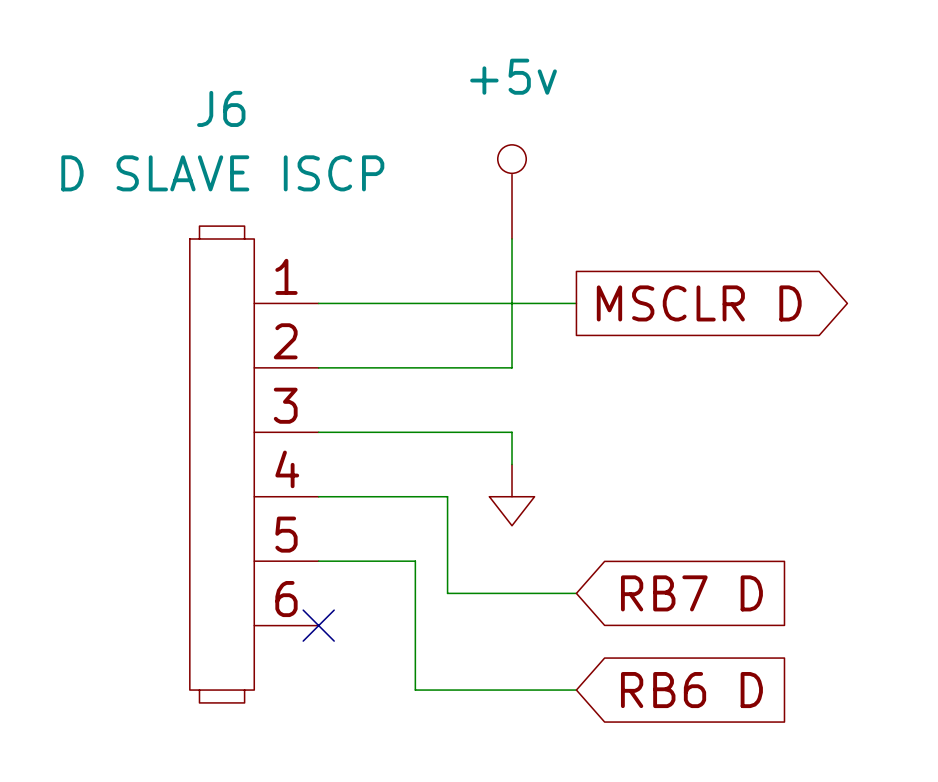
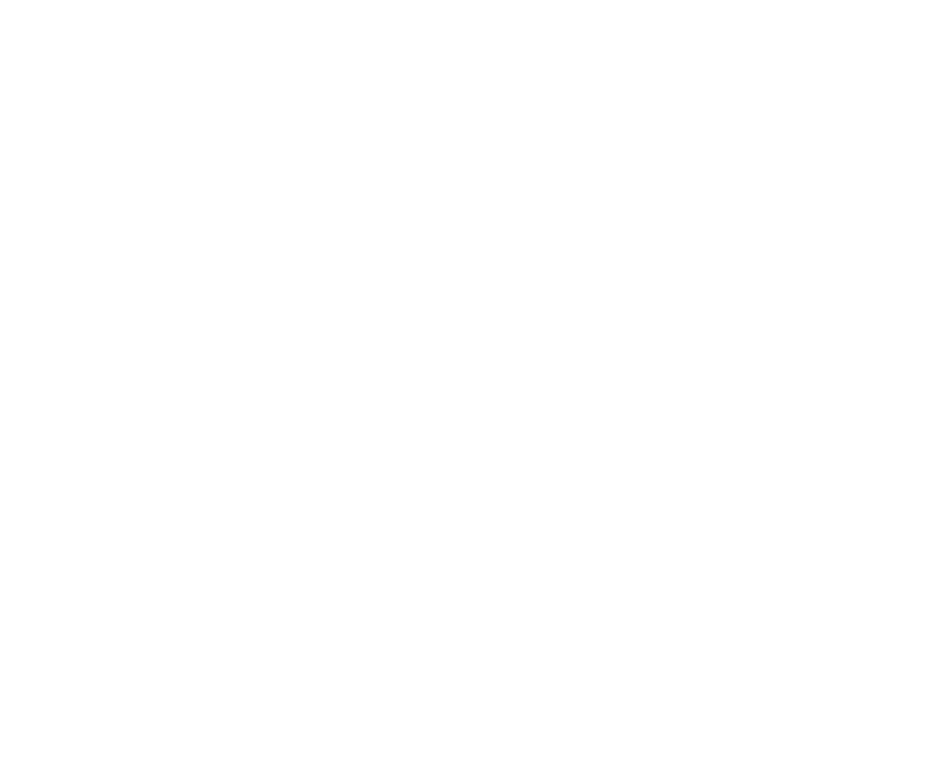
power symbol: +5v (512, 191) -> none
wire: (512, 239) (512, 367) (318, 367) -> none
wire: (318, 303) (576, 303) -> none
global label: MSCLR D (699, 303) -> none
wire: (318, 432) (512, 432) (512, 464) -> none
J6: D SLAVE ISCP (254, 464) -> none
power symbol: (512, 495) -> none
wire: (318, 496) (447, 496) (447, 593) (576, 593) -> none
wire: (318, 561) (415, 561) (415, 690) (576, 690) -> none
global label: RB7 D (691, 593) -> none
no-connect mark: (318, 625) -> none
global label: RB6 D (691, 690) -> none

